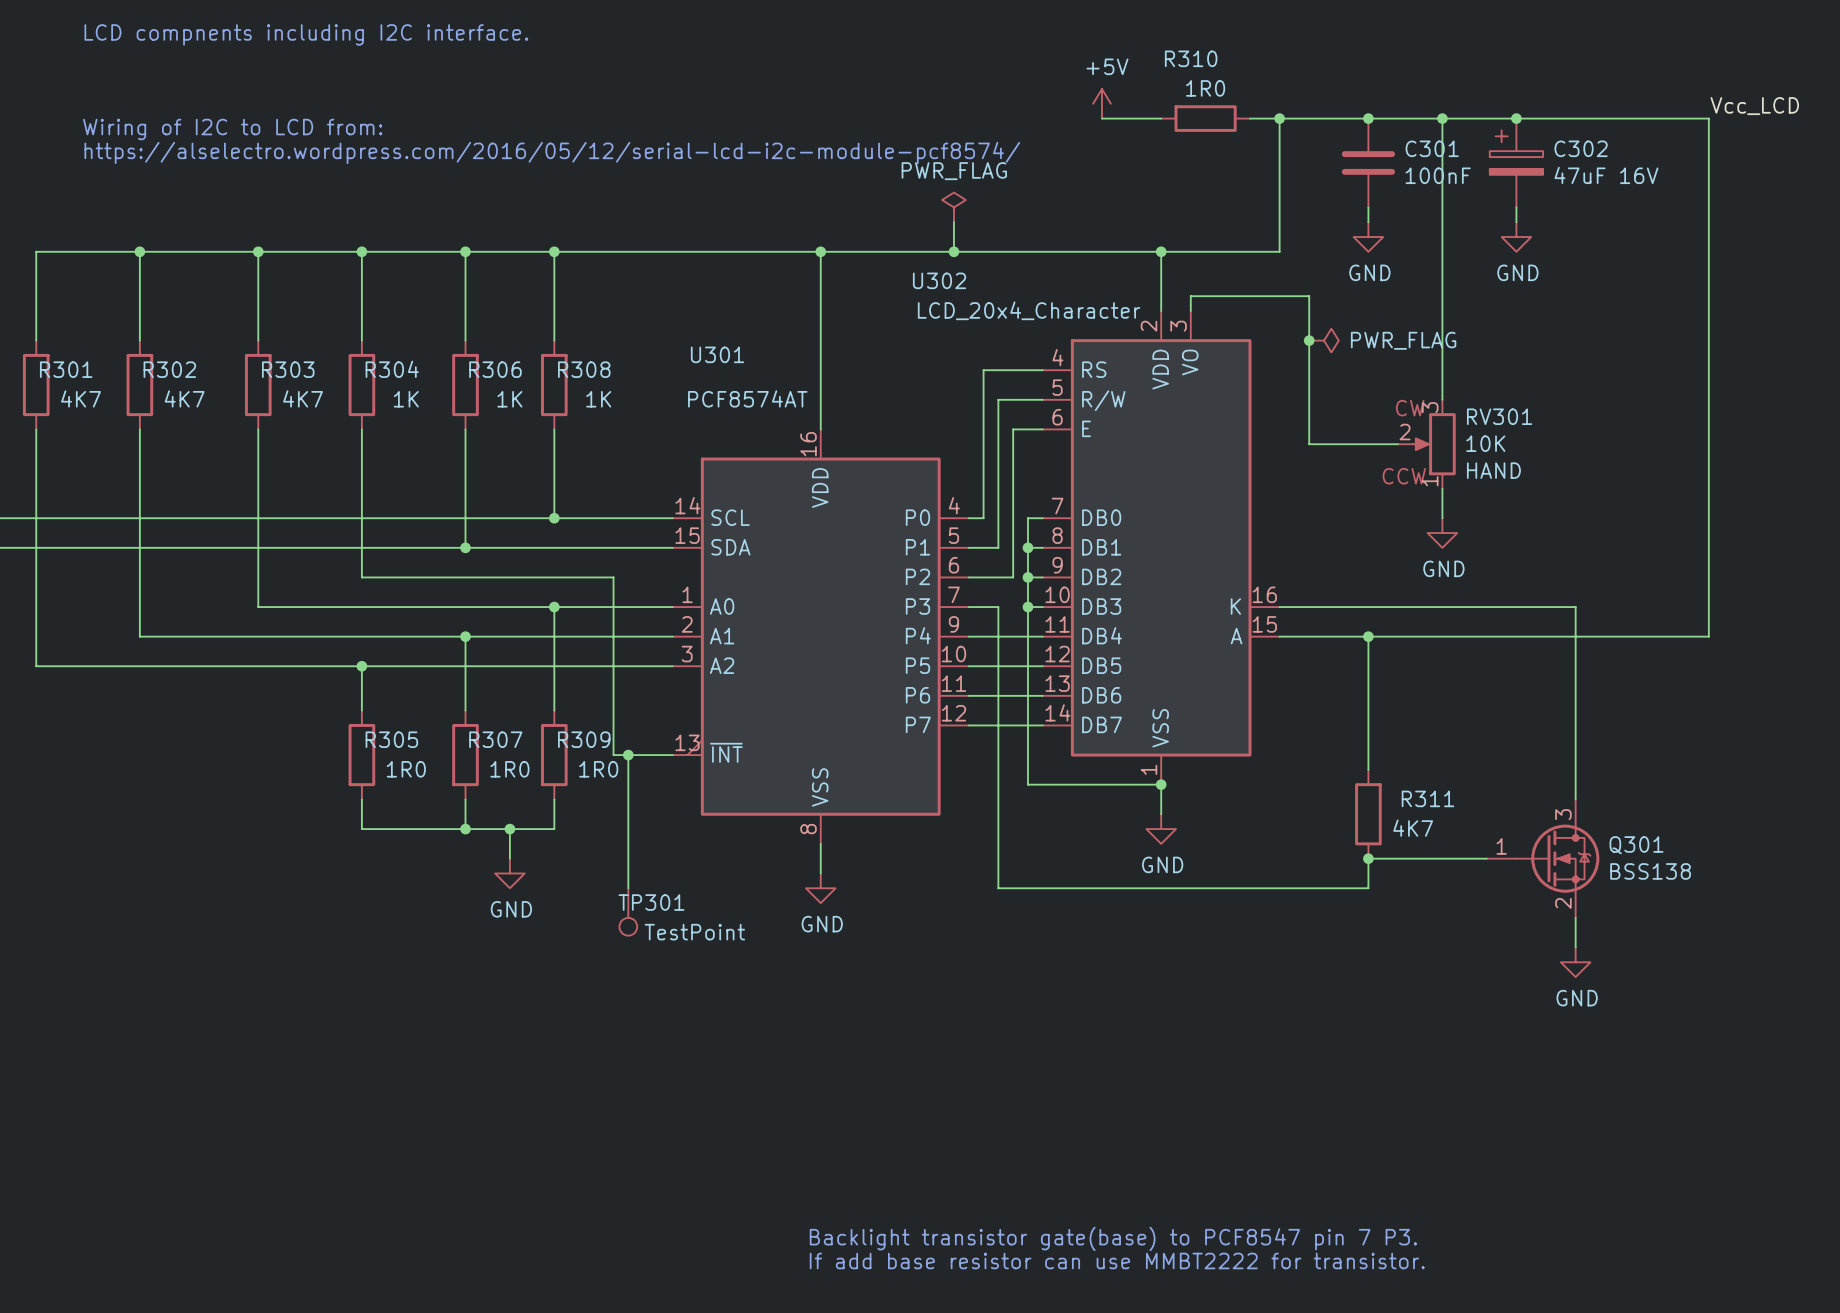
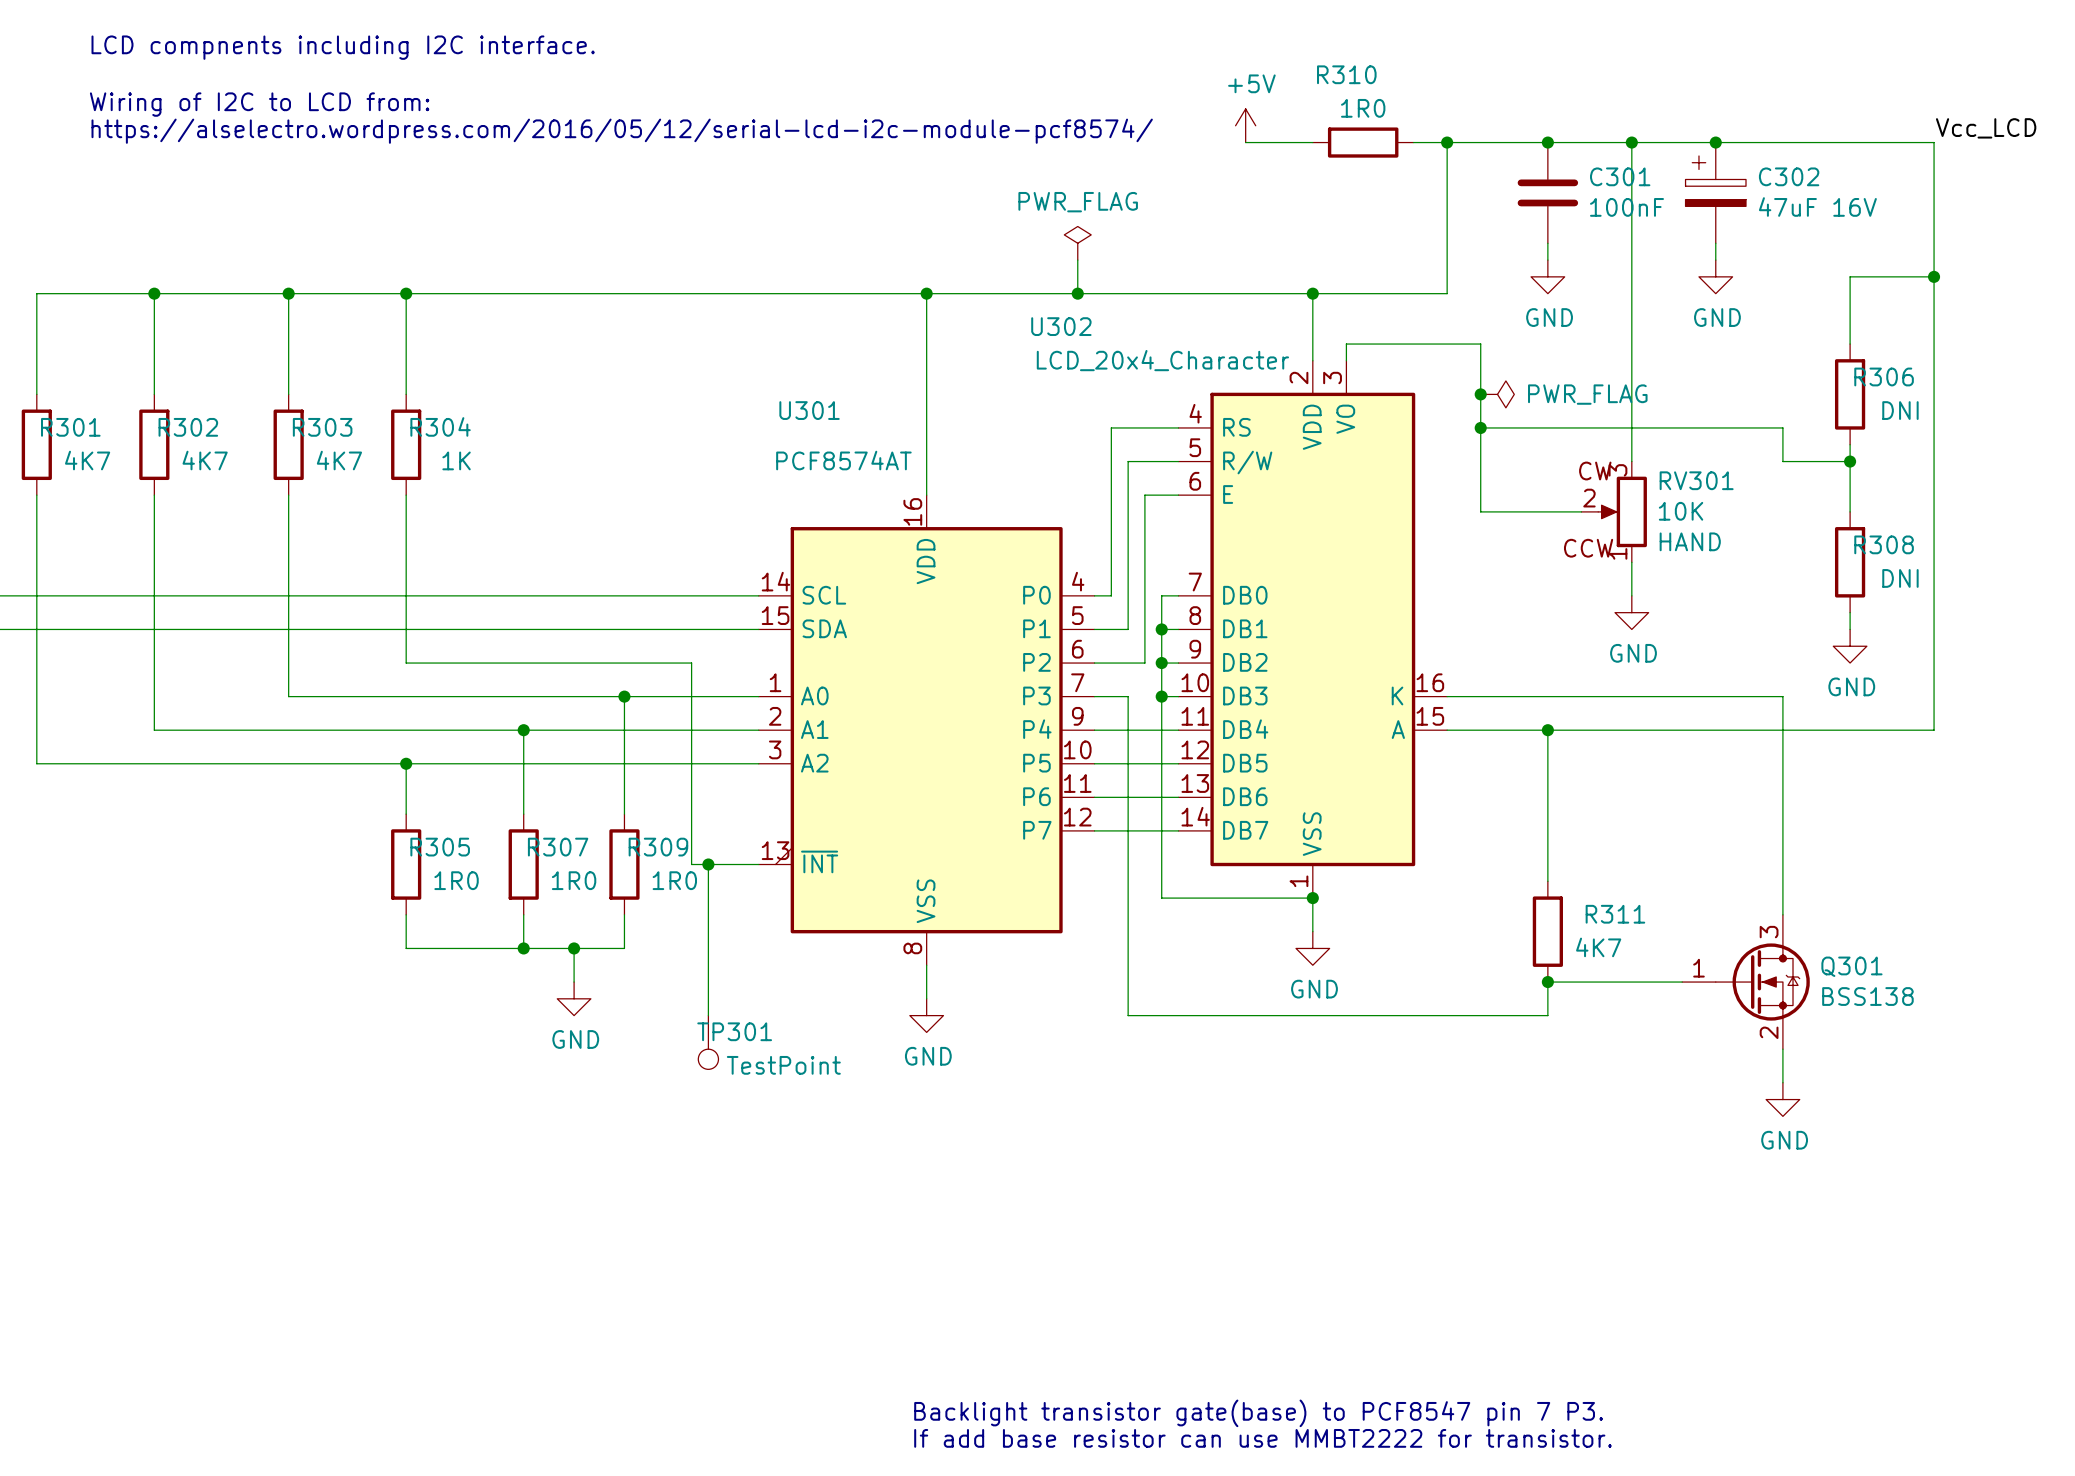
text position: Wiring of I2C to LCD from: (232, 129) -> Wiring of I2C to LCD from: (259, 104)
text position: https://alselectro.wordpress.com/2016/05/12/serial-lcd-i2c-module-pcf8574/ (552, 152) -> https://alselectro.wordpress.com/2016/05/12/serial-lcd-i2c-module-pcf8574/ (622, 131)
wire: none -> (1934, 276) (1850, 276) (1850, 344)
junction: none -> (1934, 276)
wire: (465, 251) (465, 340) -> none
junction: (465, 251) -> none
wire: (554, 251) (554, 340) -> none
junction: (554, 251) -> none
wire: none -> (1480, 427) (1782, 427) (1782, 461) (1850, 461)
junction: none -> (1480, 427)
R306 position: (465, 385) -> (1850, 394)
R308 position: (554, 385) -> (1850, 562)
wire: none -> (1850, 444) (1850, 511)
R306 value: 1K (509, 399) -> DNI (1900, 410)
R308 value: 1K (598, 399) -> DNI (1900, 578)
junction: none -> (1850, 461)
wire: (465, 429) (465, 547) -> none
wire: (554, 429) (554, 518) -> none
junction: (554, 518) -> none
wire: none -> (1850, 612) (1850, 629)
junction: (465, 547) -> none
power symbol: none -> GND (1850, 646)

